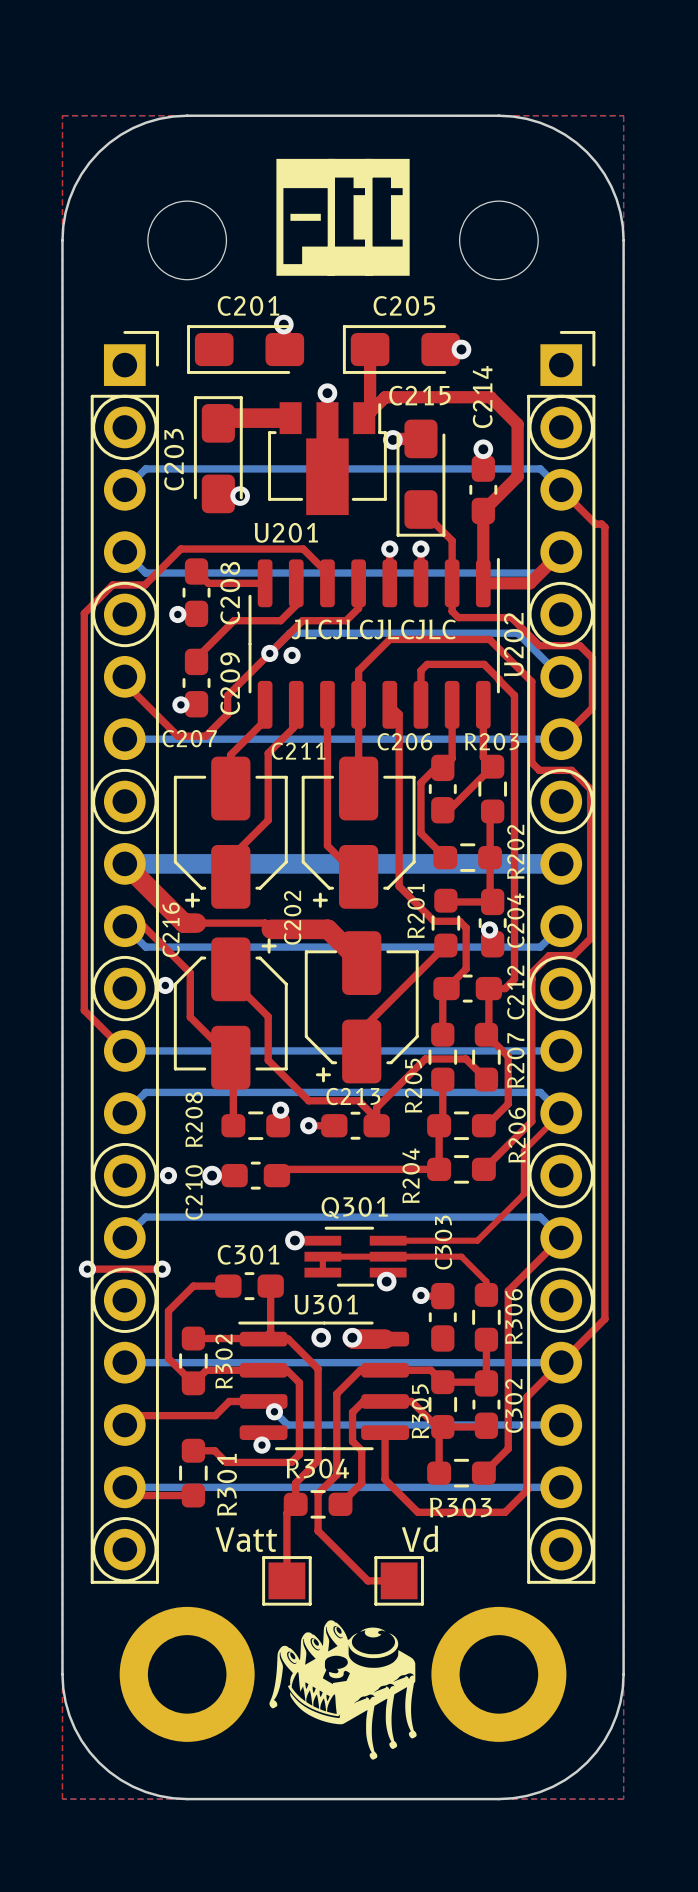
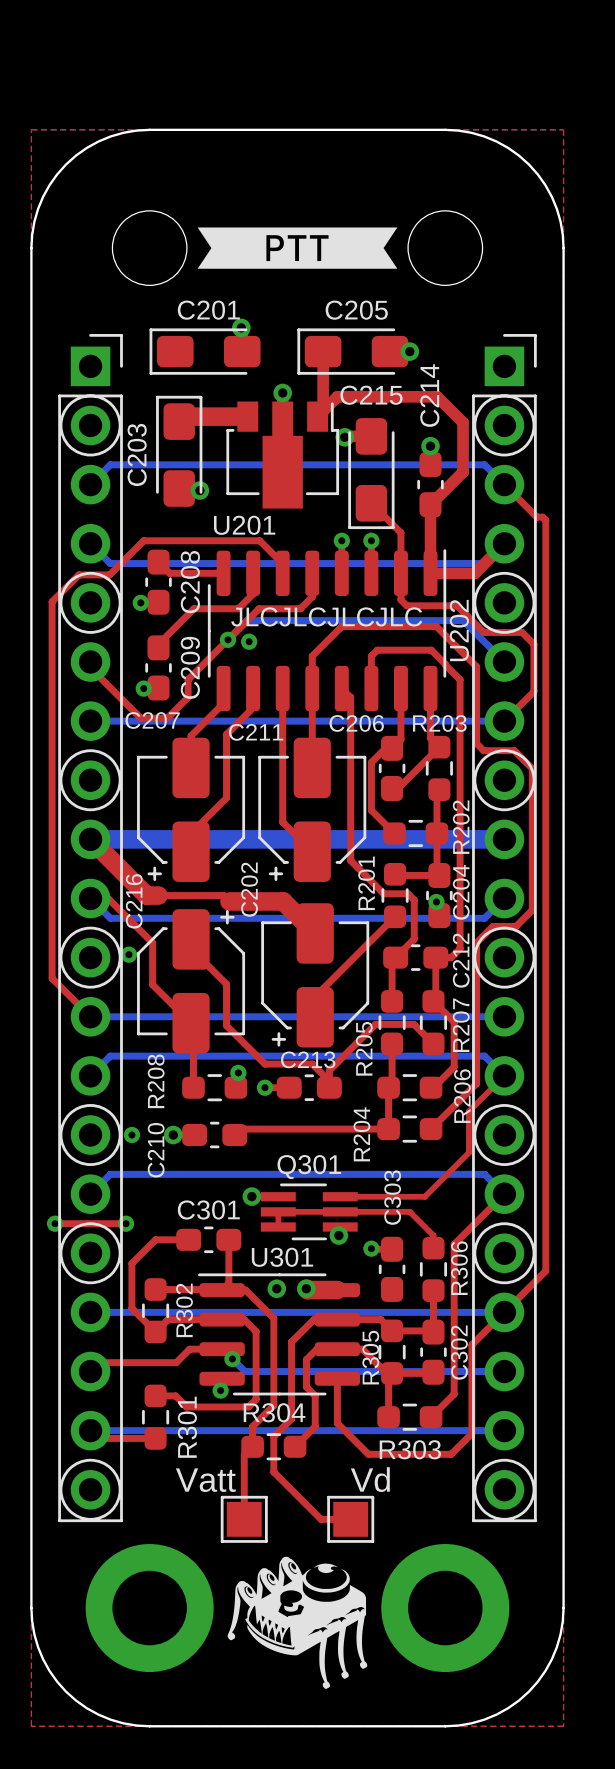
drawing shape: [276, 158, 410, 276] -> [197, 227, 398, 269]

